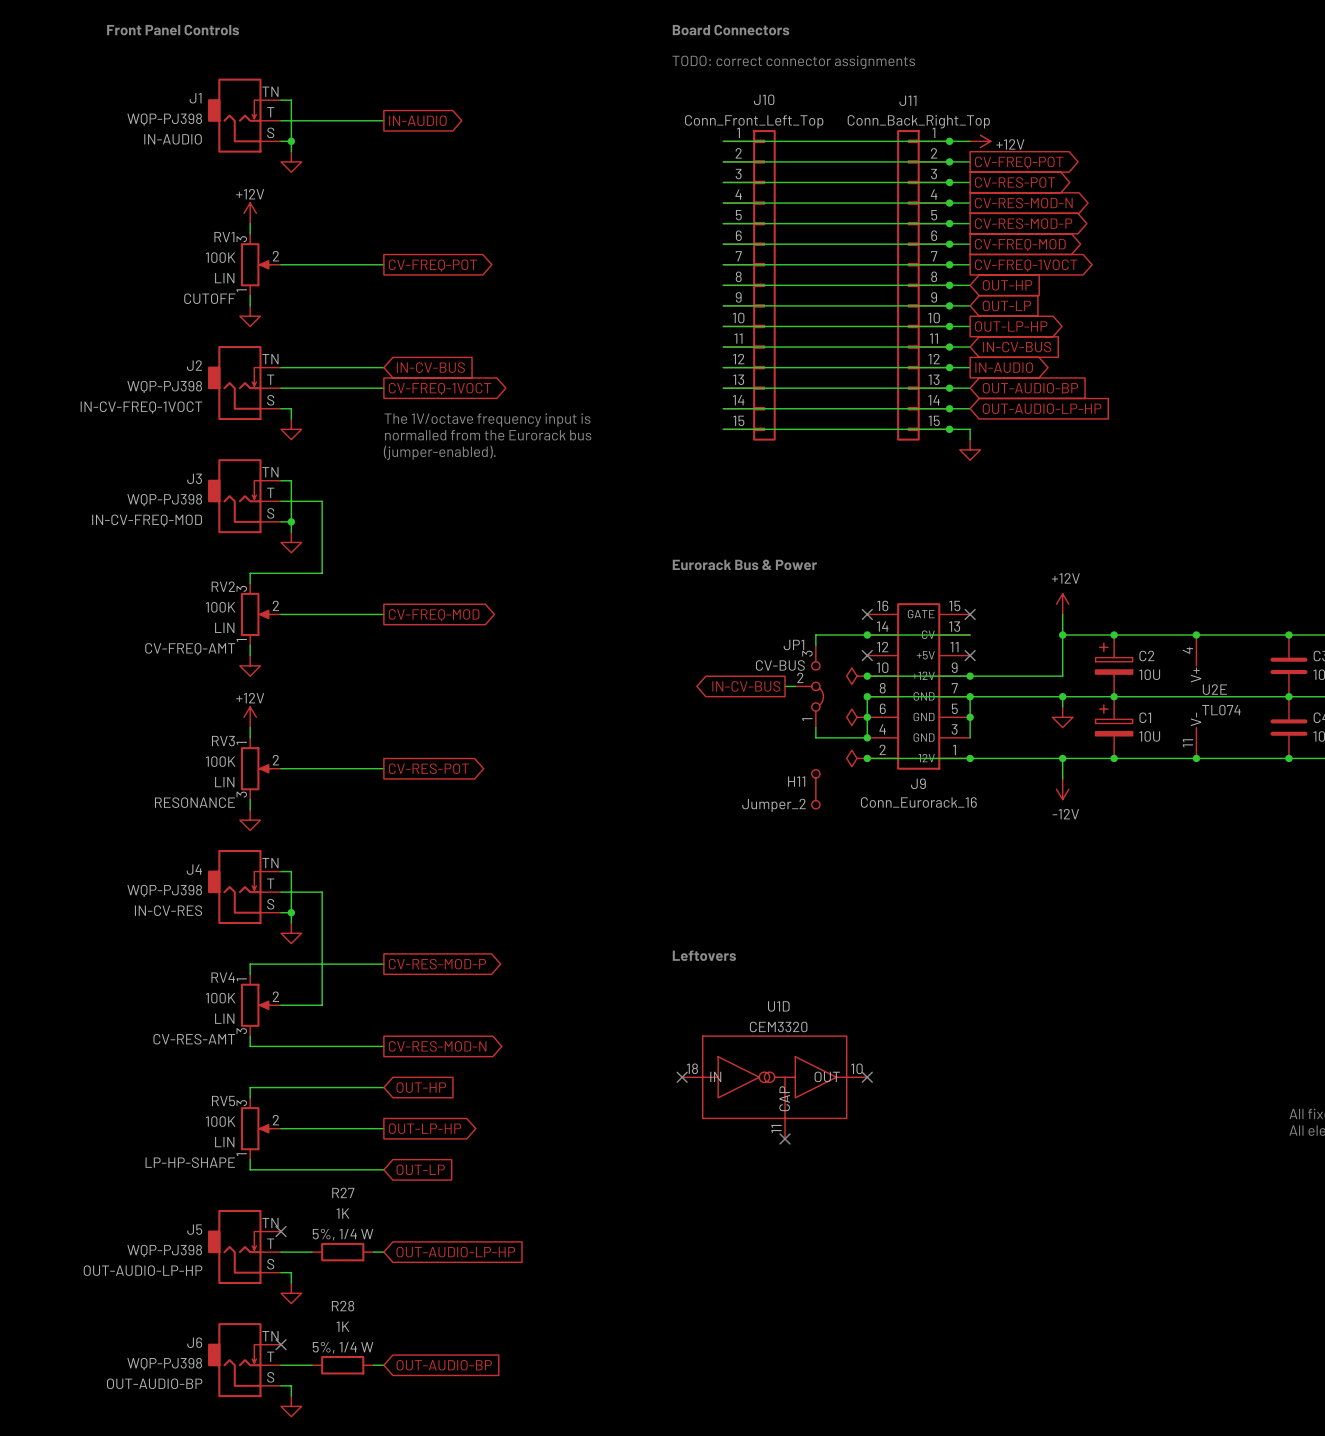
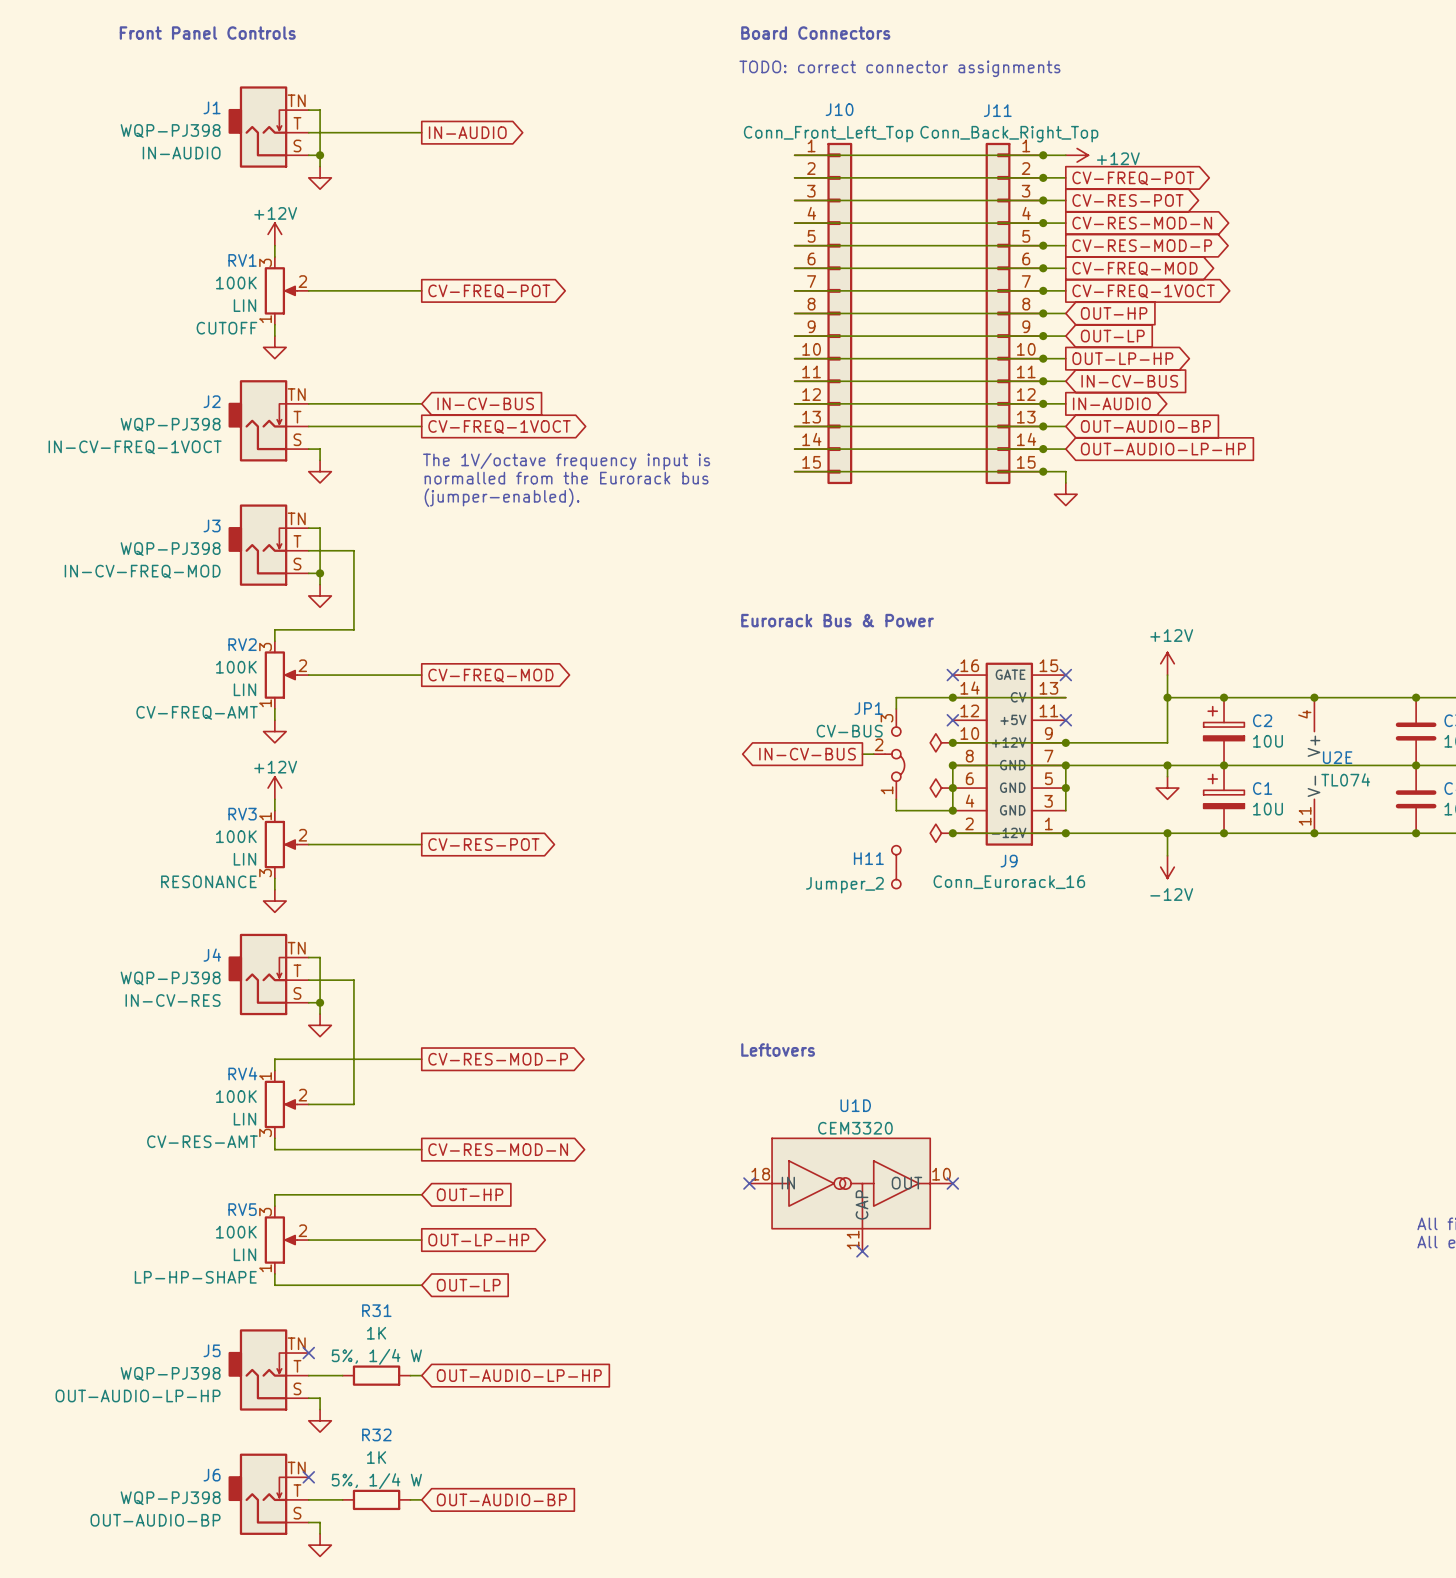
R27 name: R27 (343, 1192) -> R31 (376, 1310)
R28 name: R28 (342, 1306) -> R32 (376, 1434)

